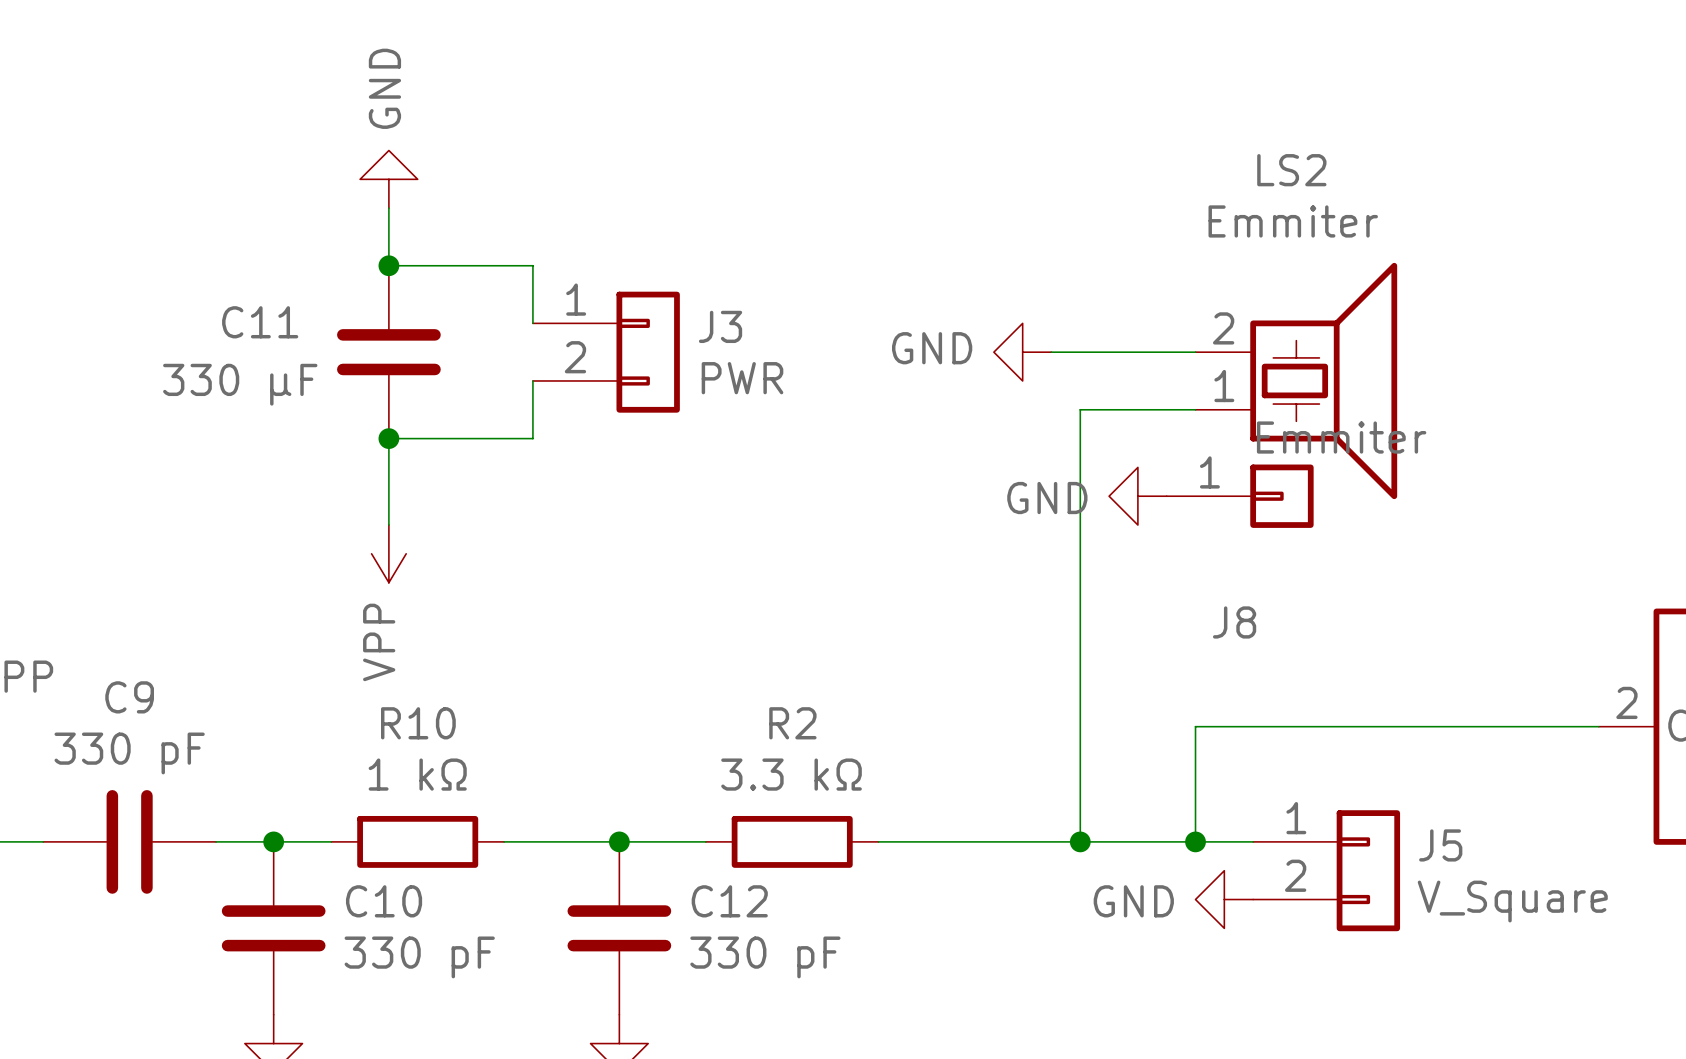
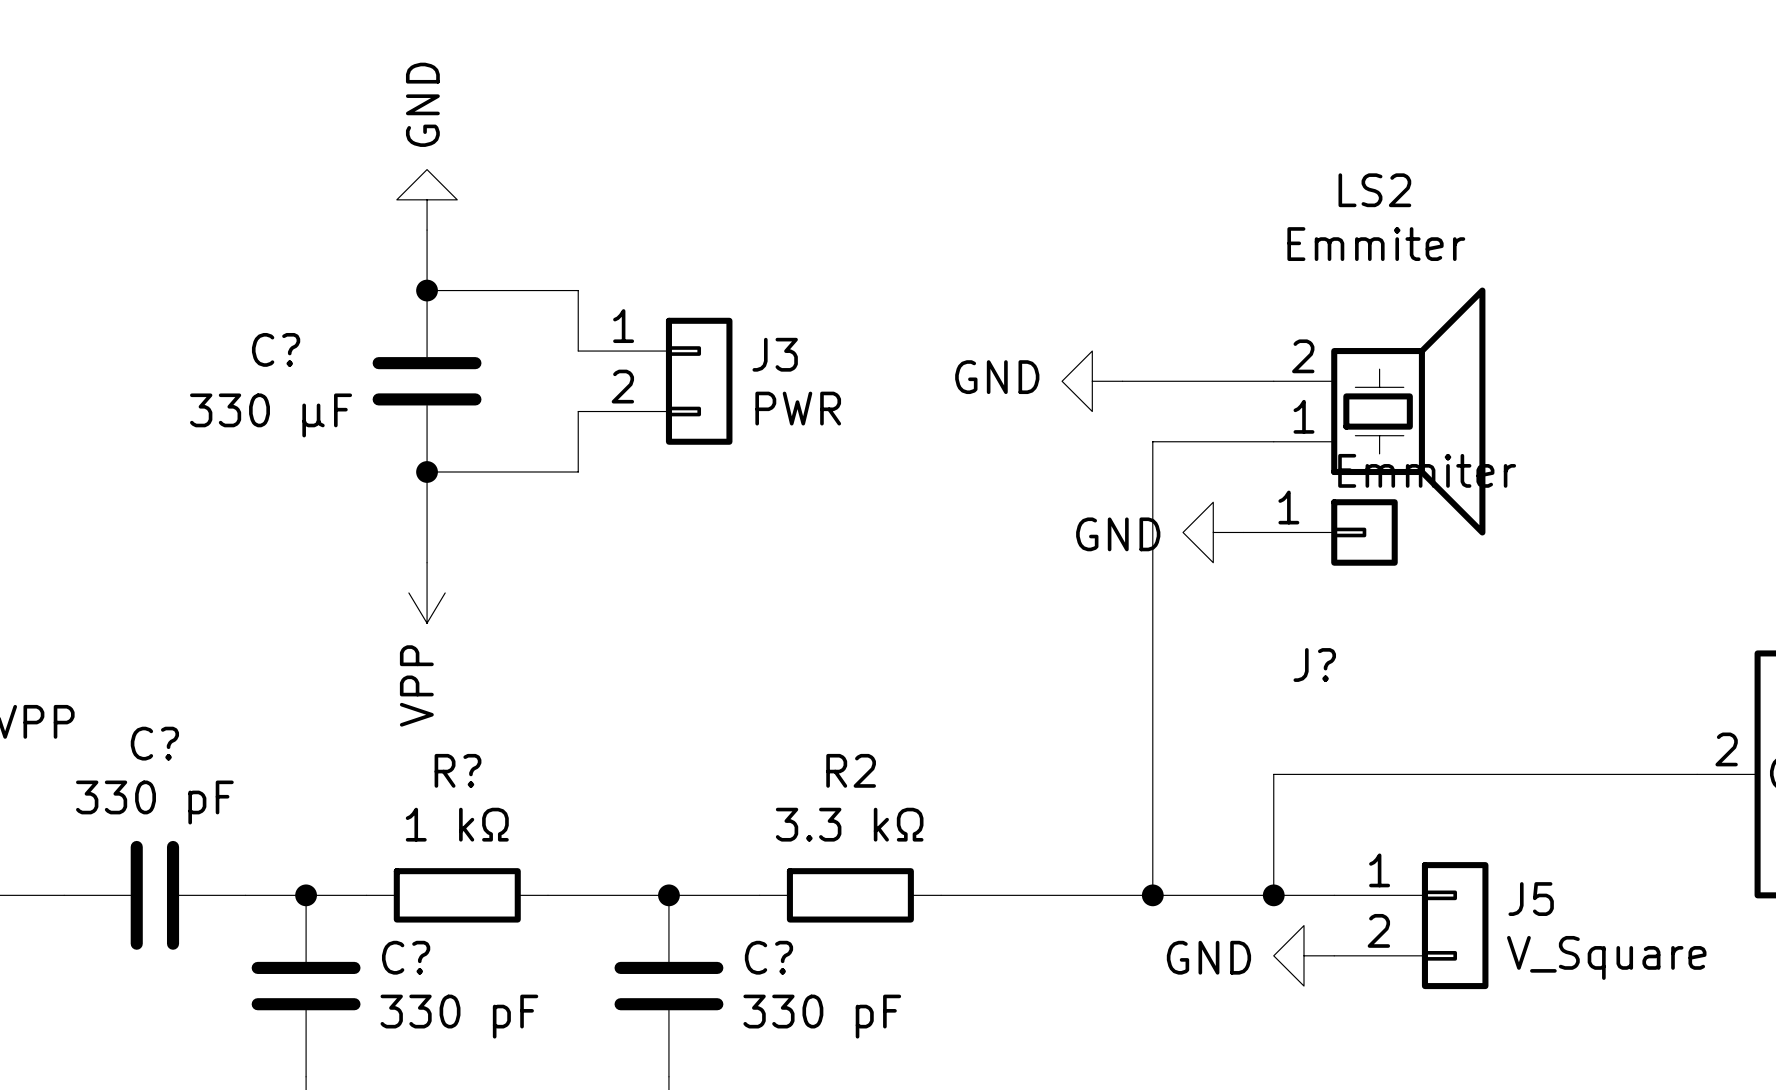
C11 name: C11 (260, 322) -> C? (276, 349)
J8 name: J8 (1234, 622) -> J? (1314, 665)
C9 name: C9 (129, 697) -> C? (154, 743)
R10 name: R10 (418, 723) -> R? (458, 770)
C10 name: C10 (384, 901) -> C? (406, 957)
C12 name: C12 (729, 901) -> C? (768, 957)

